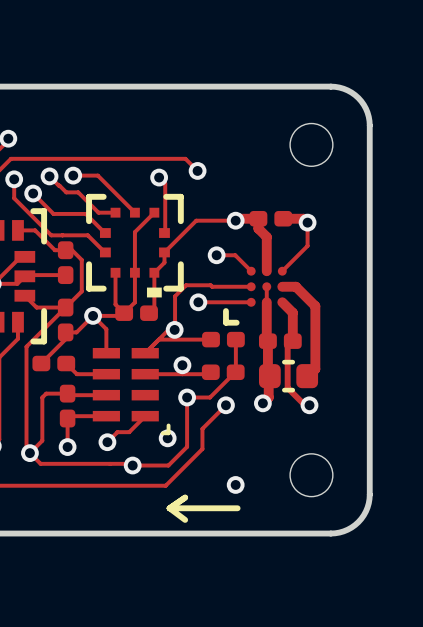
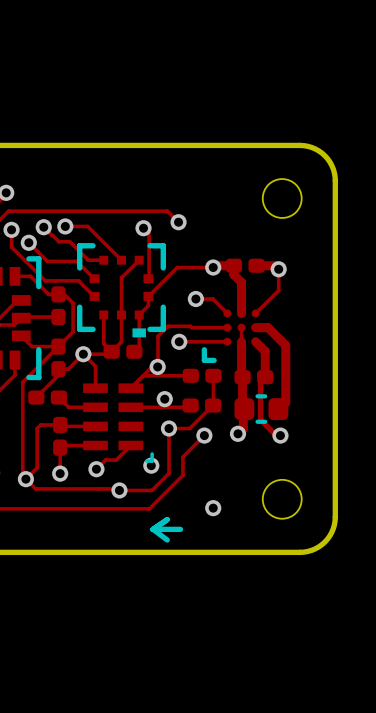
line: (199, 508) (237, 508) -> none

